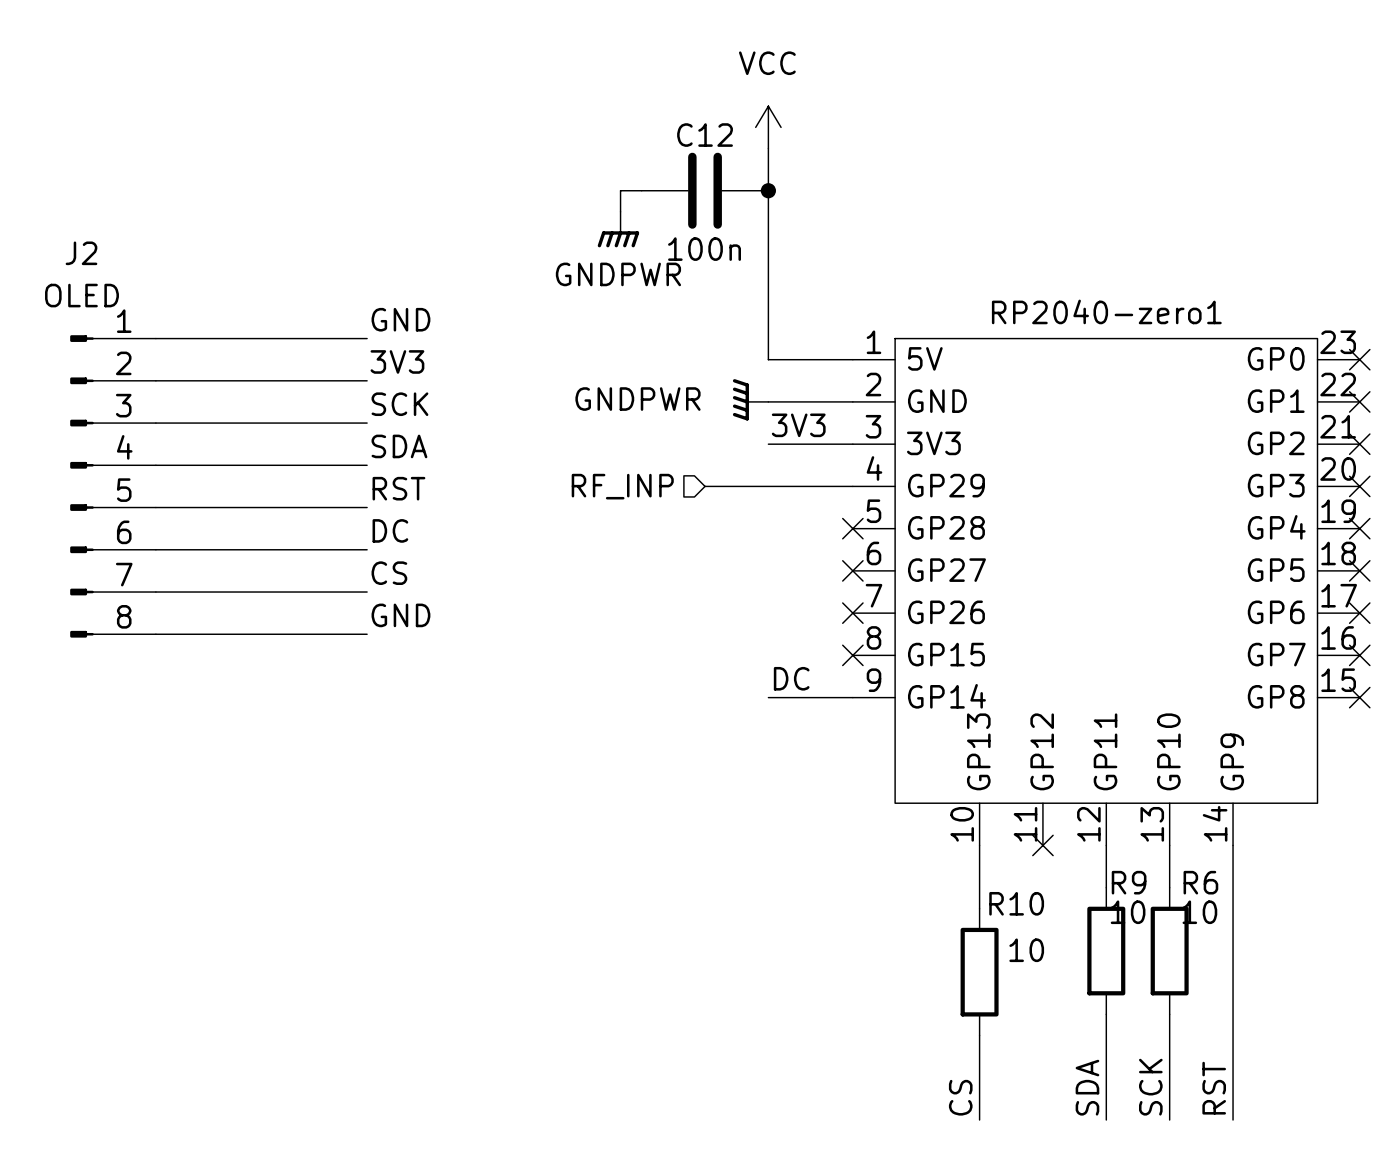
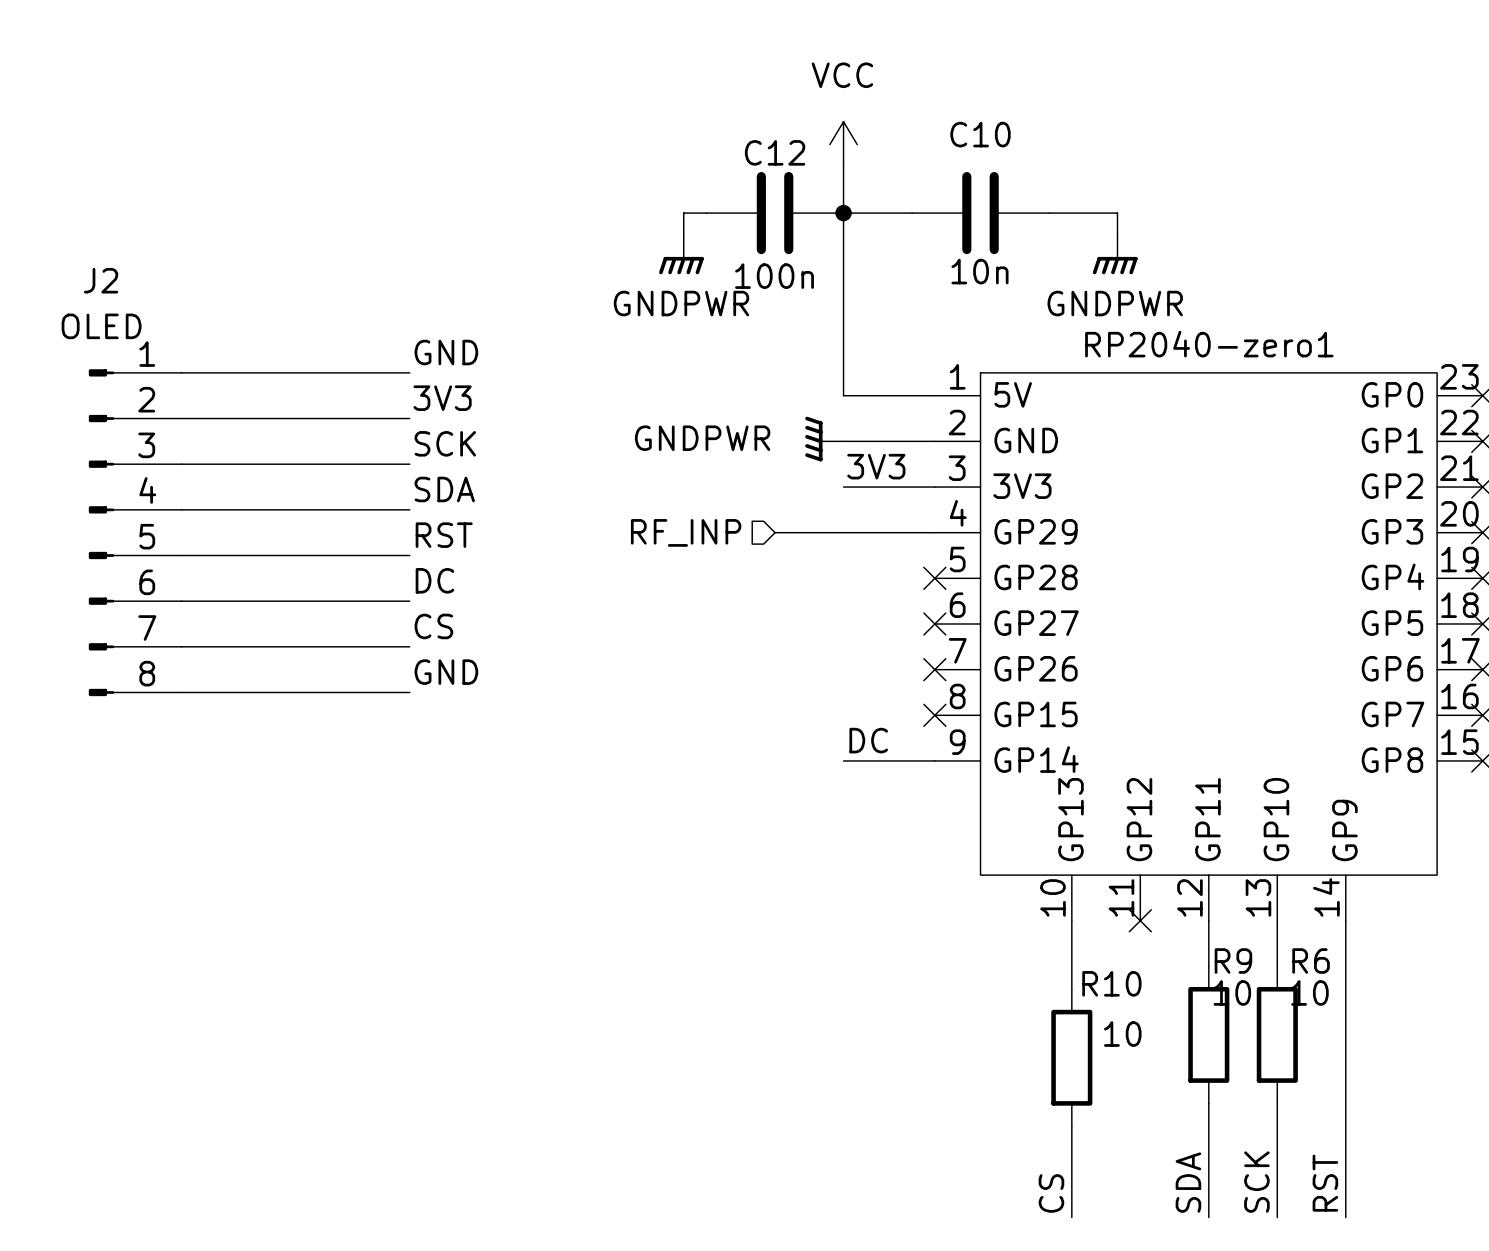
wire: none -> (843, 213) (912, 213)
C10: none -> 10n (980, 213)
wire: none -> (1049, 213) (1117, 213) (1117, 235)
power symbol: none -> GNDPWR (1115, 255)

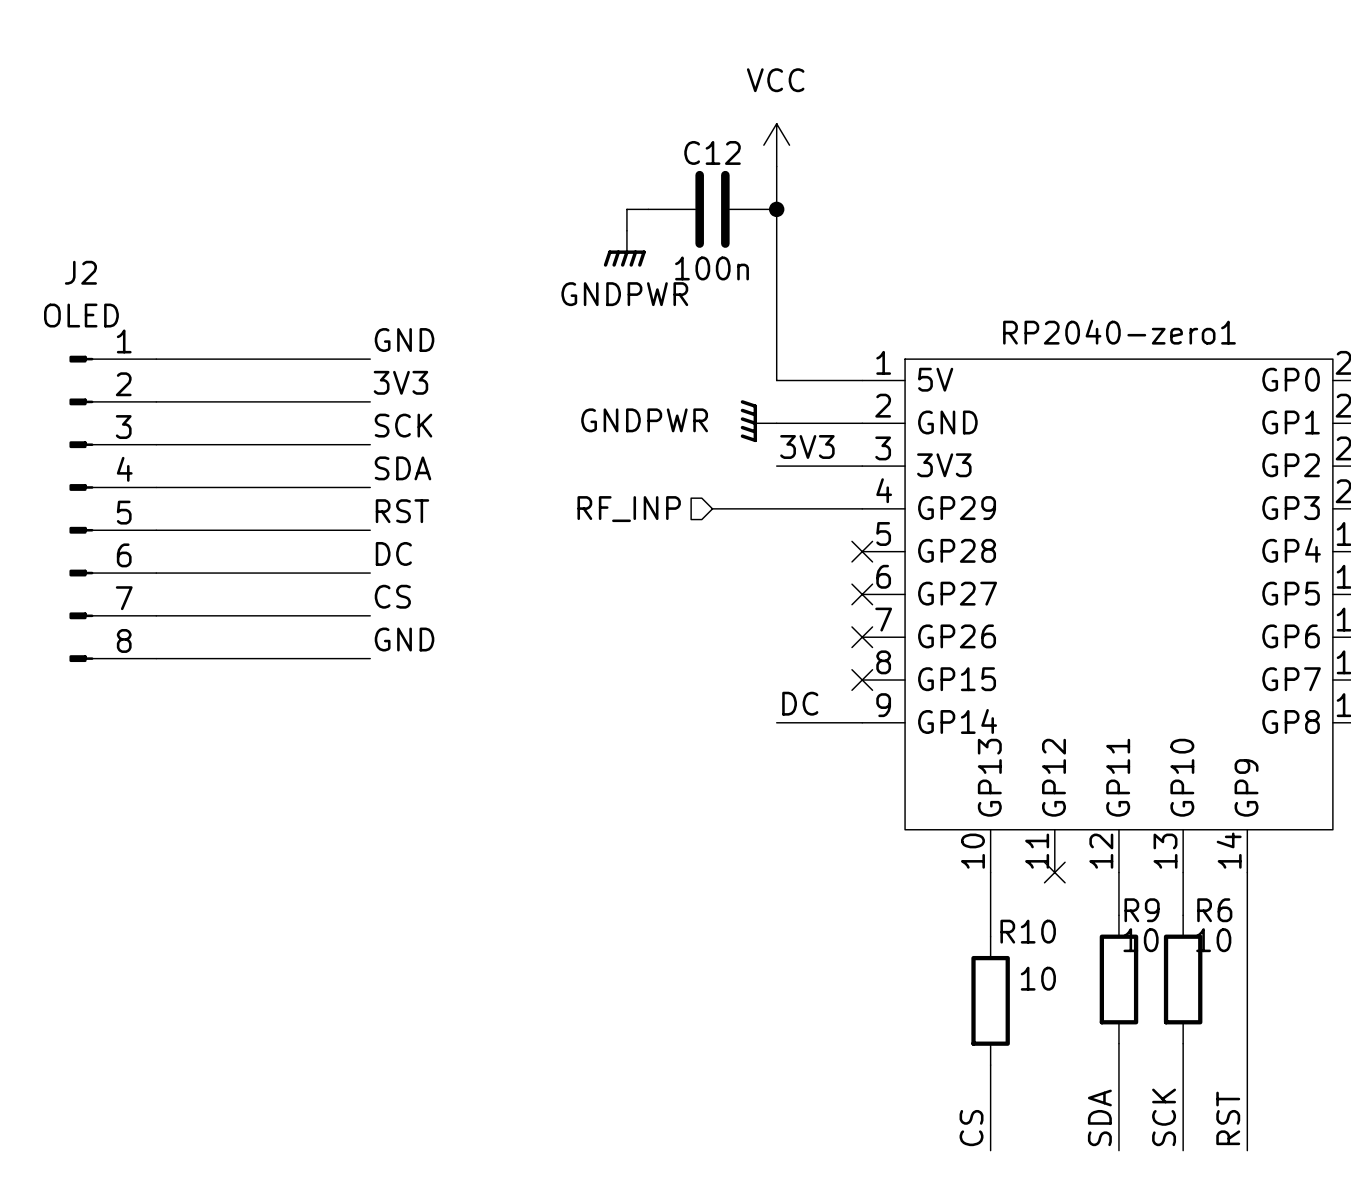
wire: (843, 213) (912, 213) -> none
C10: 10n (980, 213) -> none
wire: (1049, 213) (1117, 213) (1117, 235) -> none
power symbol: GNDPWR (1115, 255) -> none

